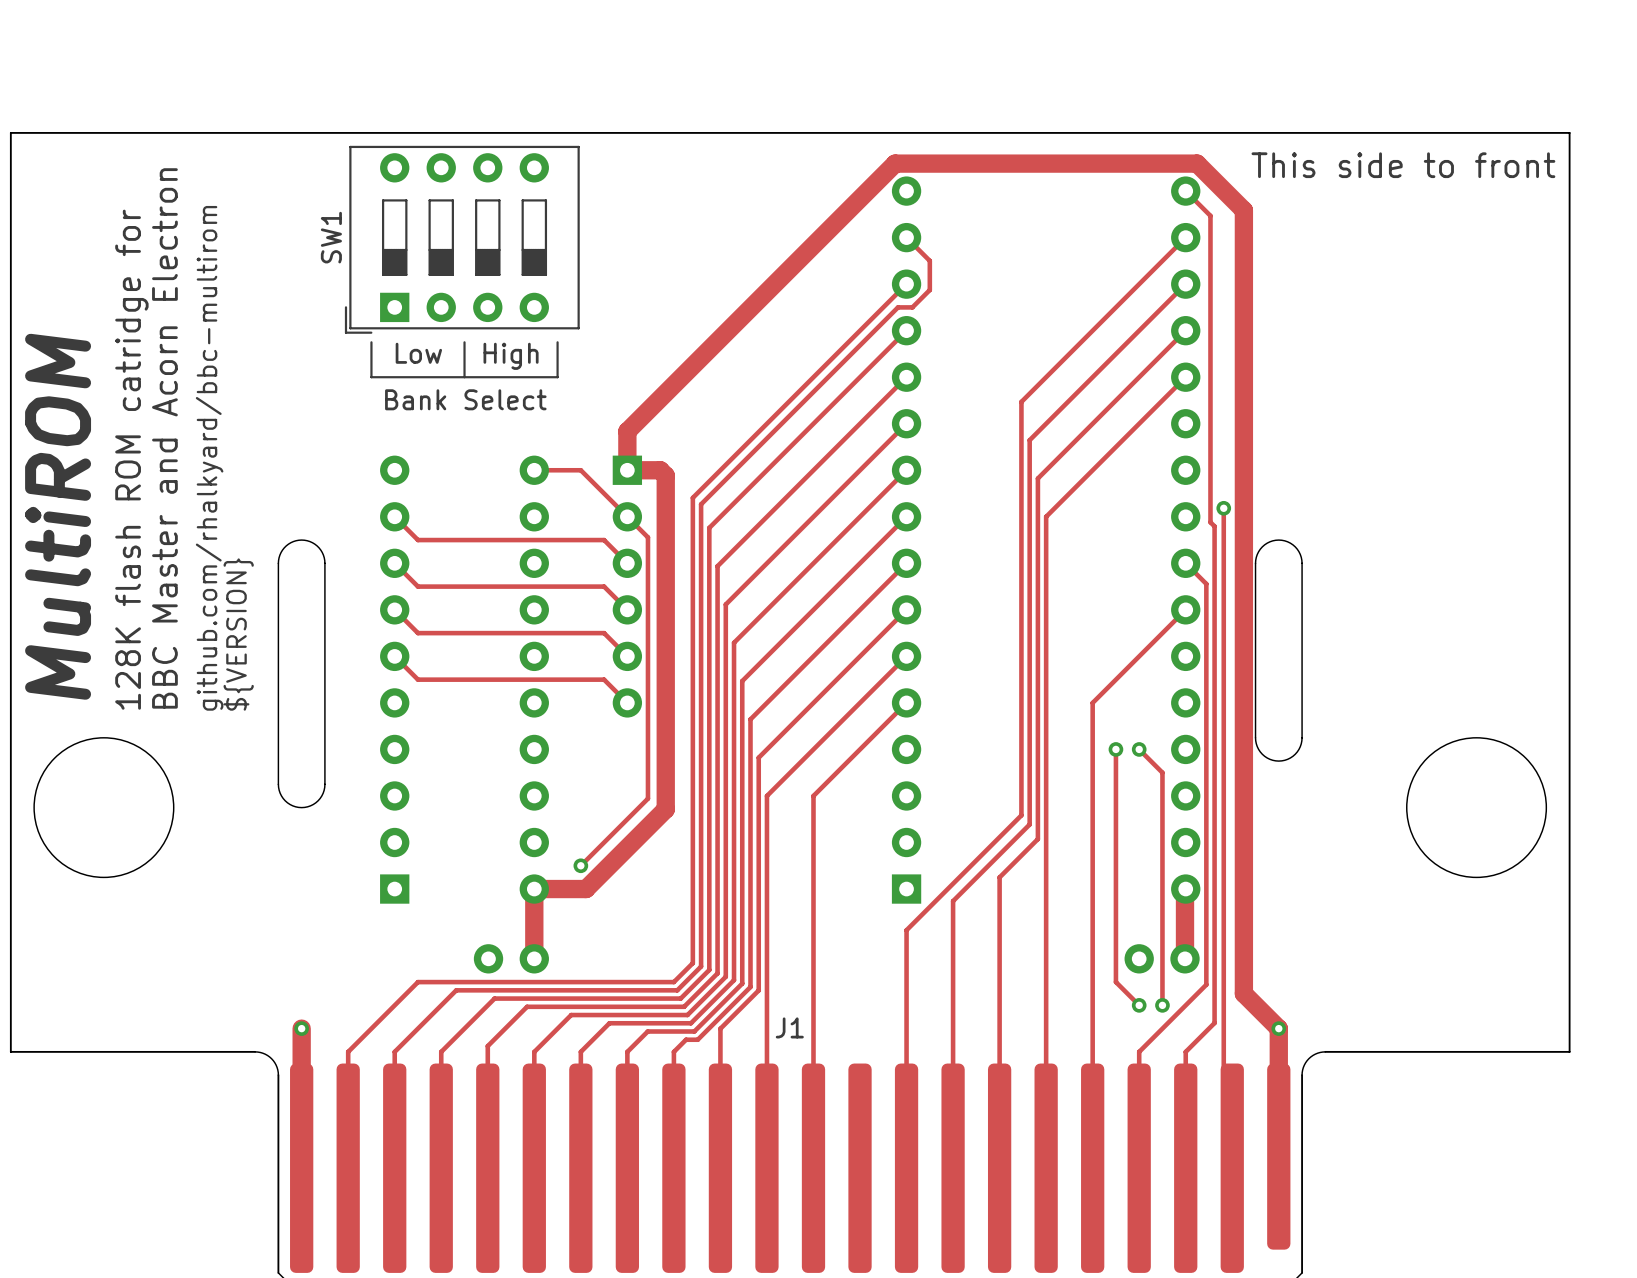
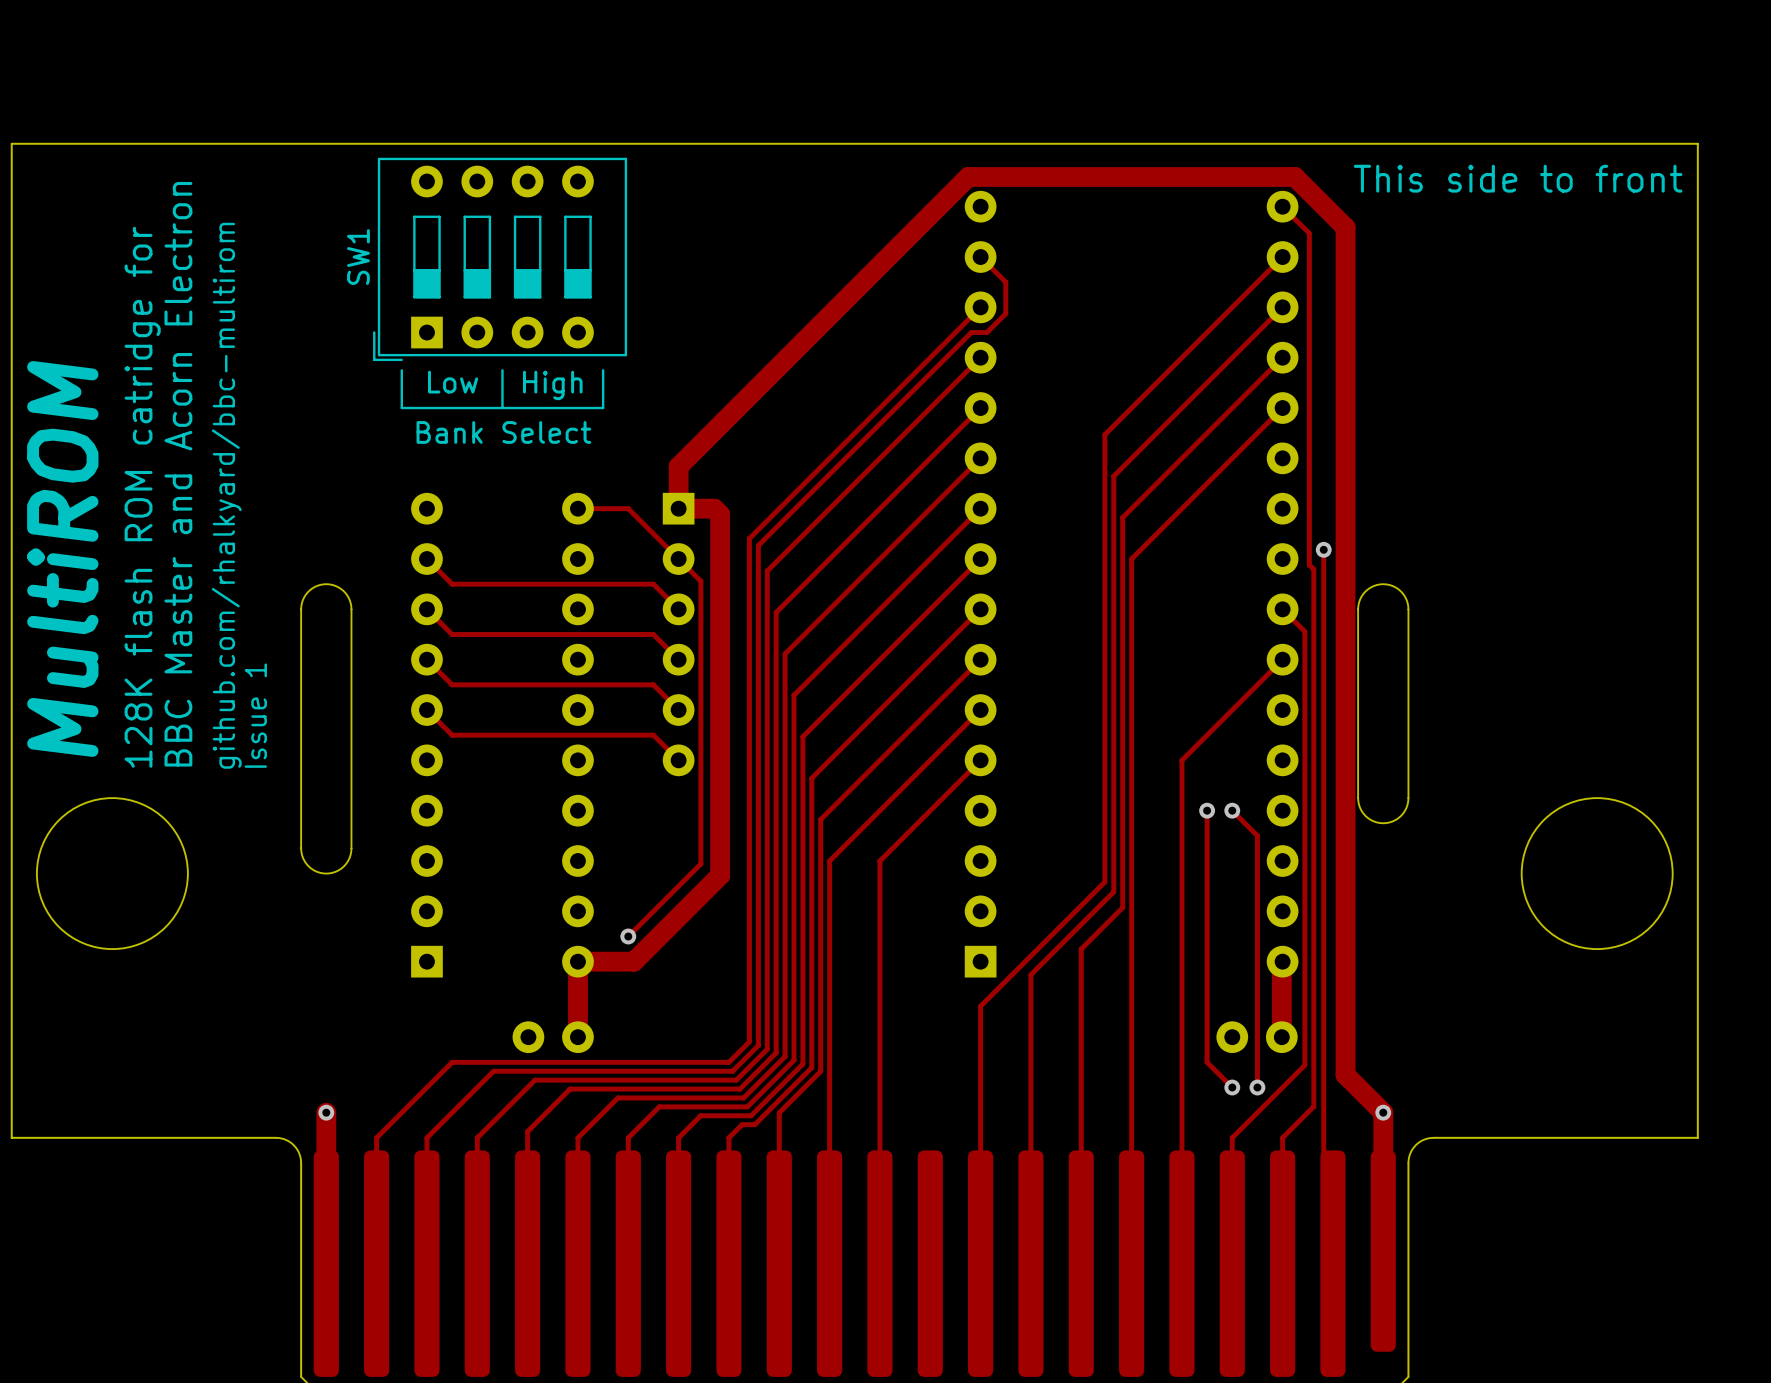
text: ${VERSION} (238, 634) -> Issue 1 (255, 715)
J1 name: J1 (789, 1027) -> none

